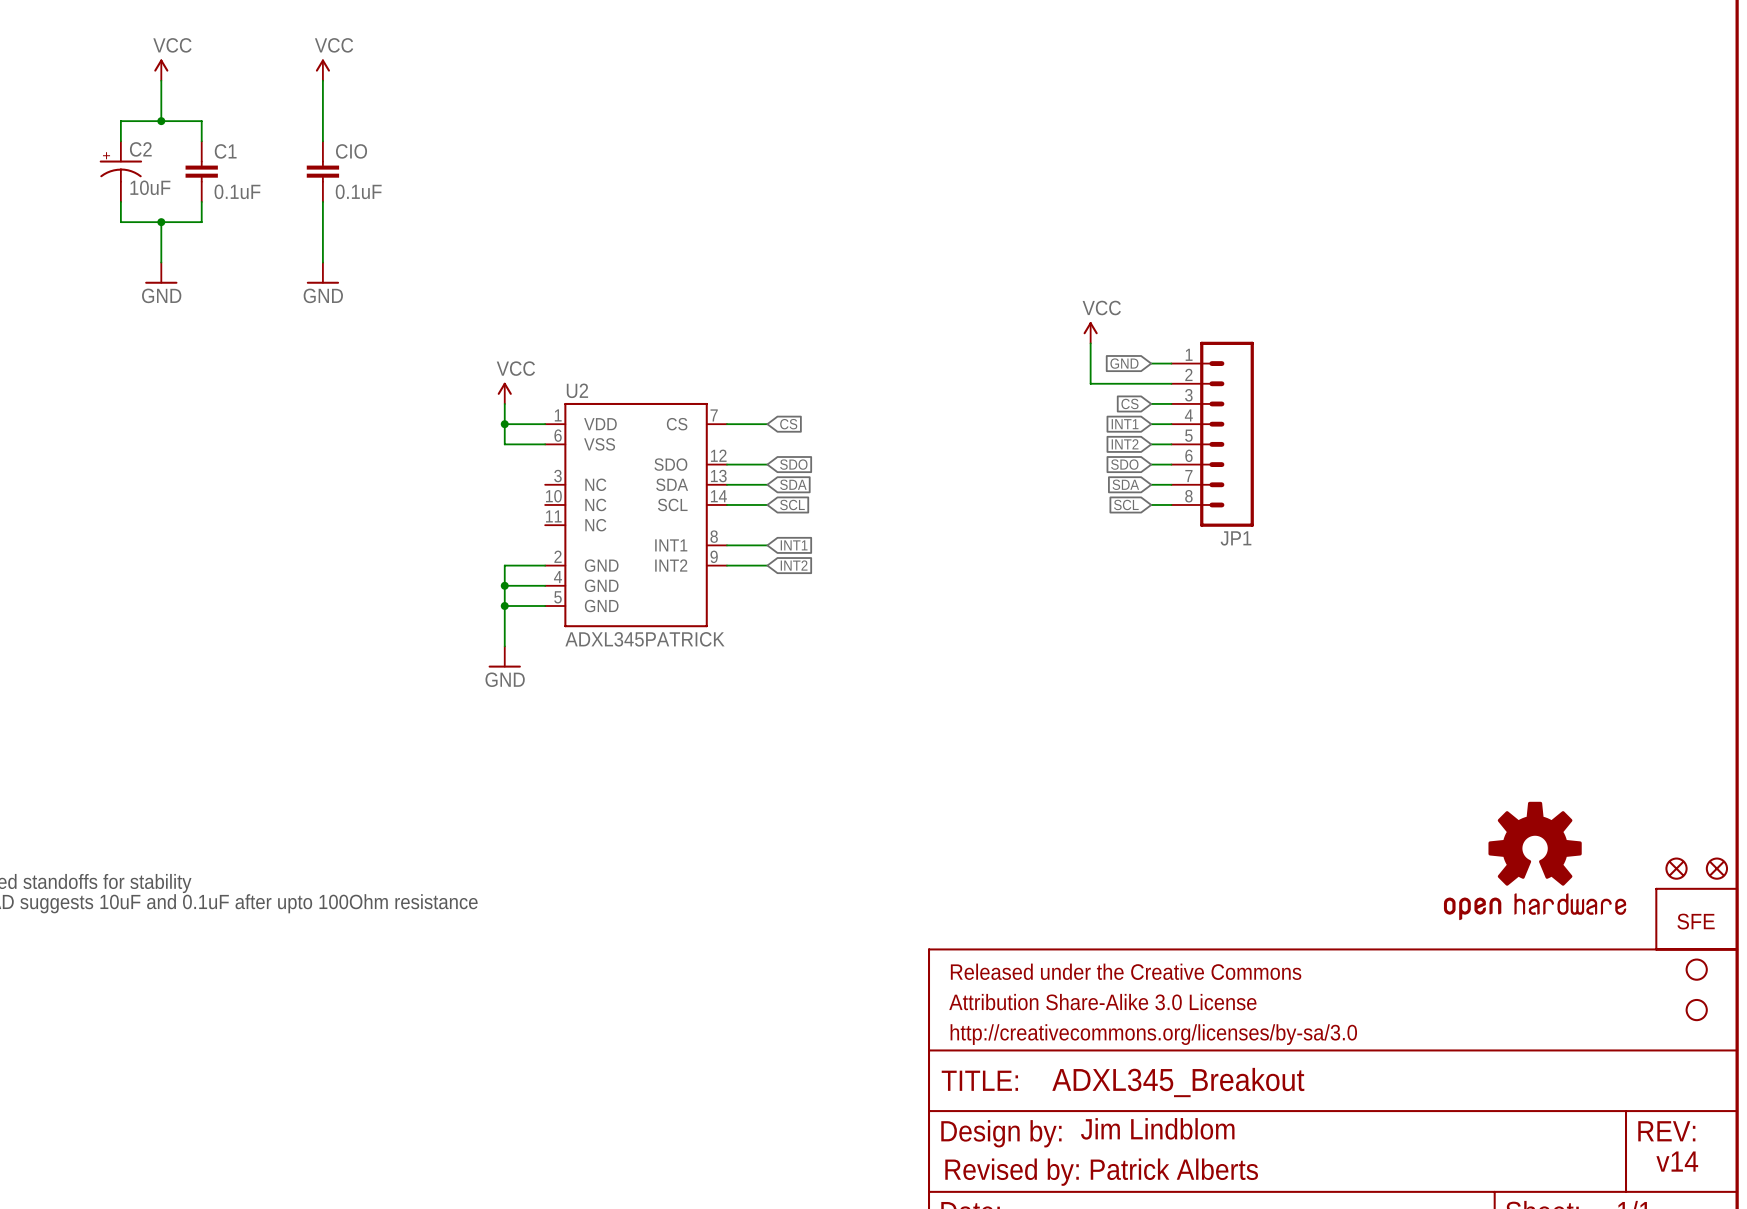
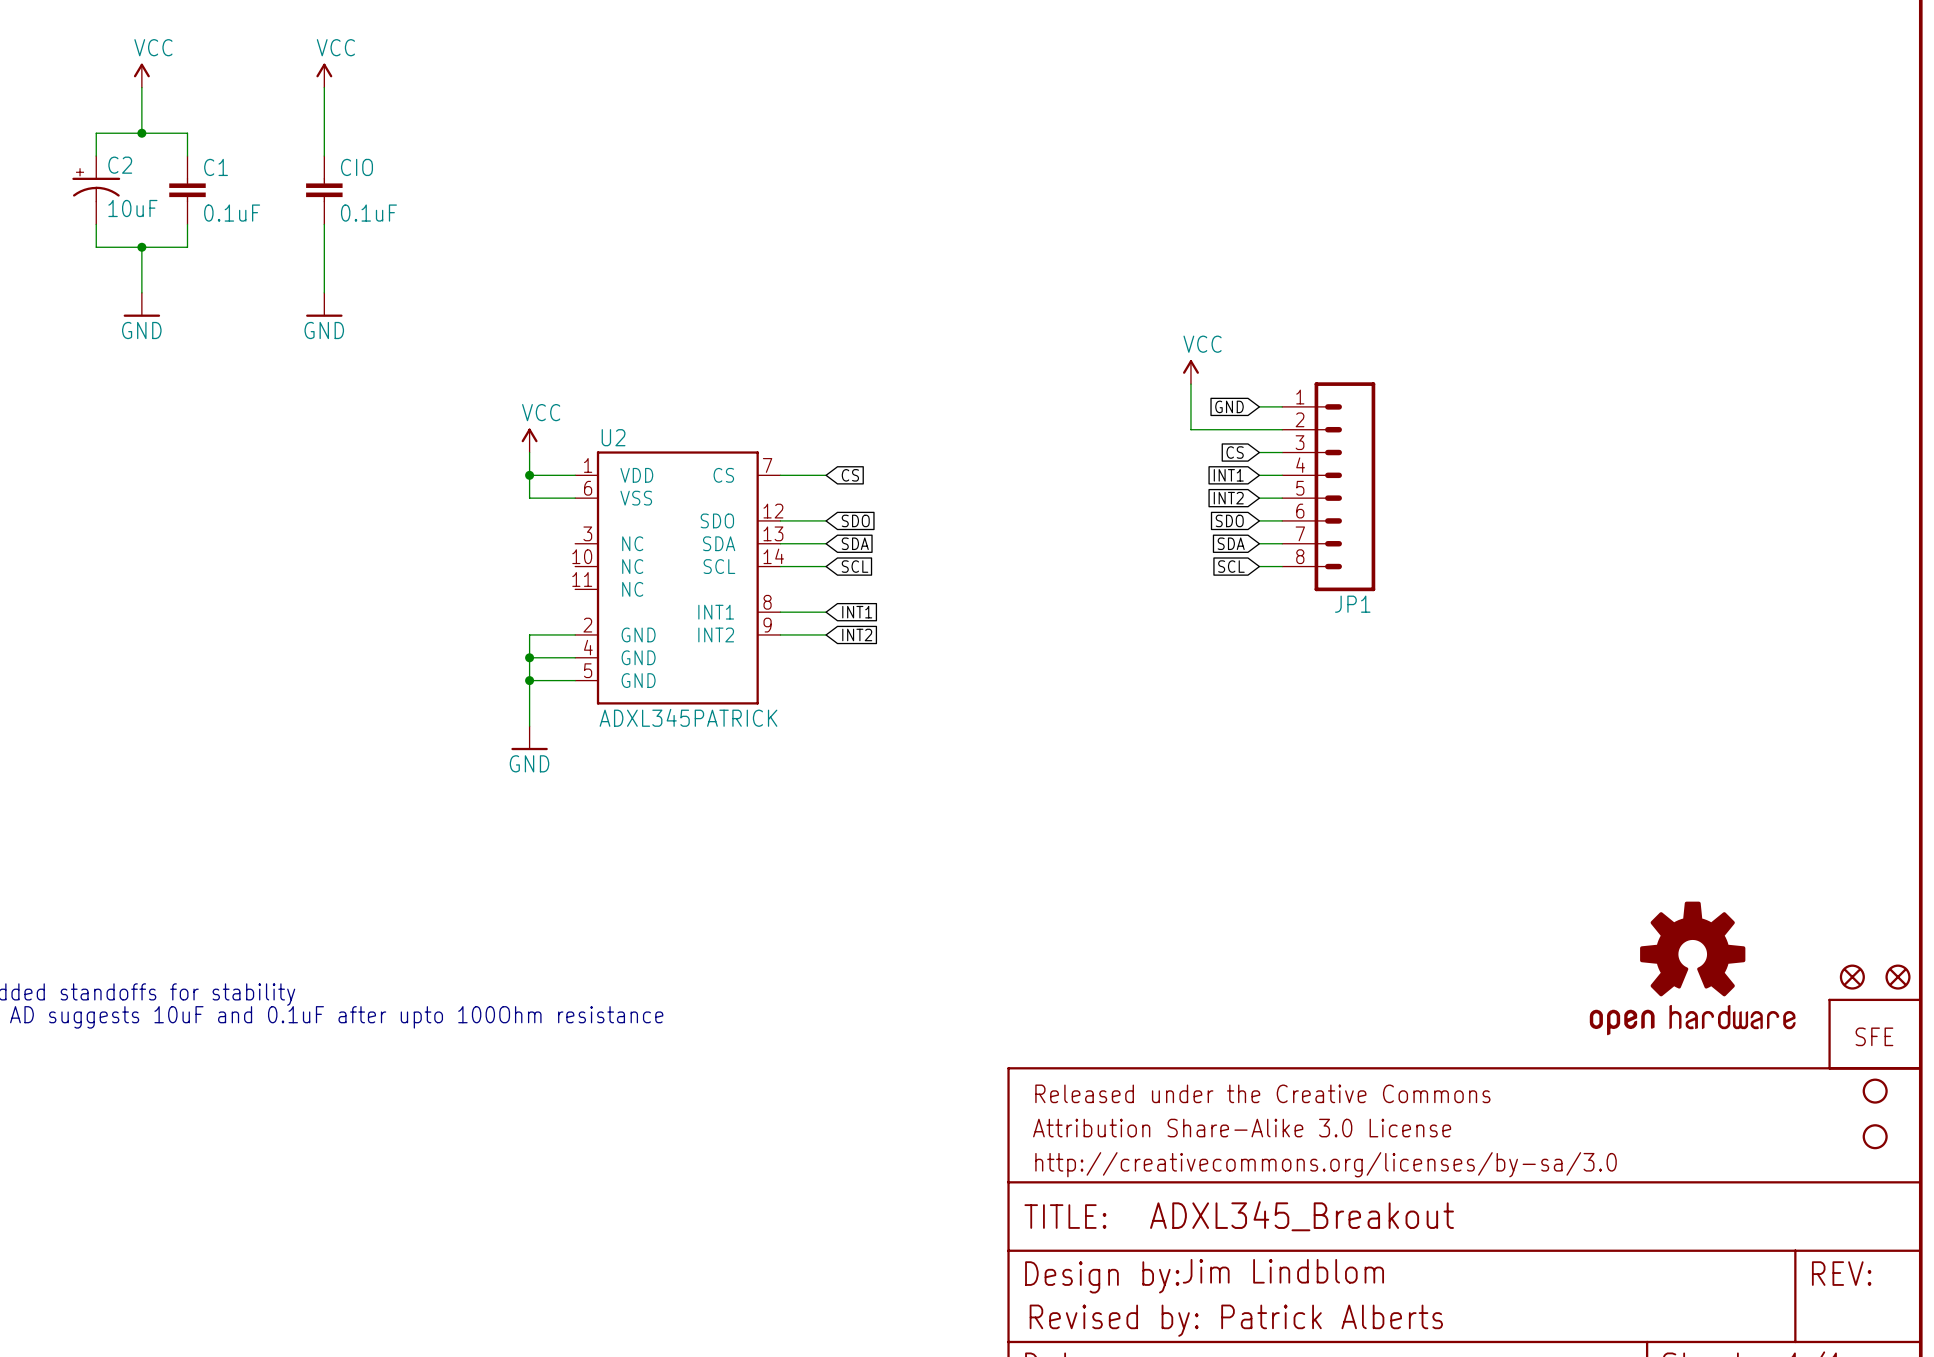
text: v14 (1677, 1161) -> none

